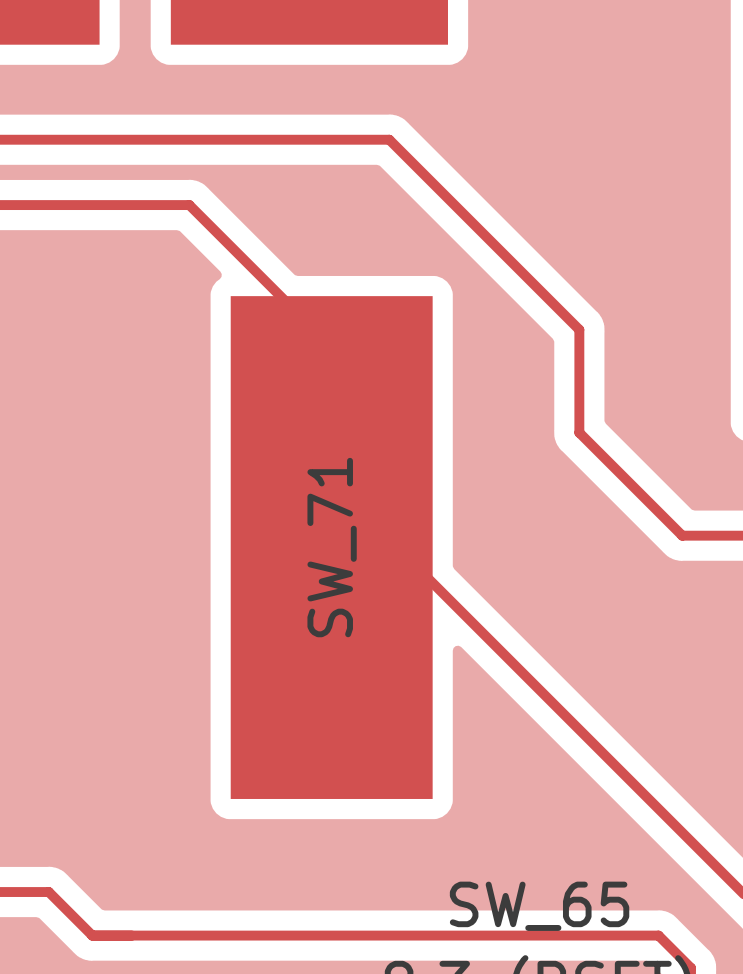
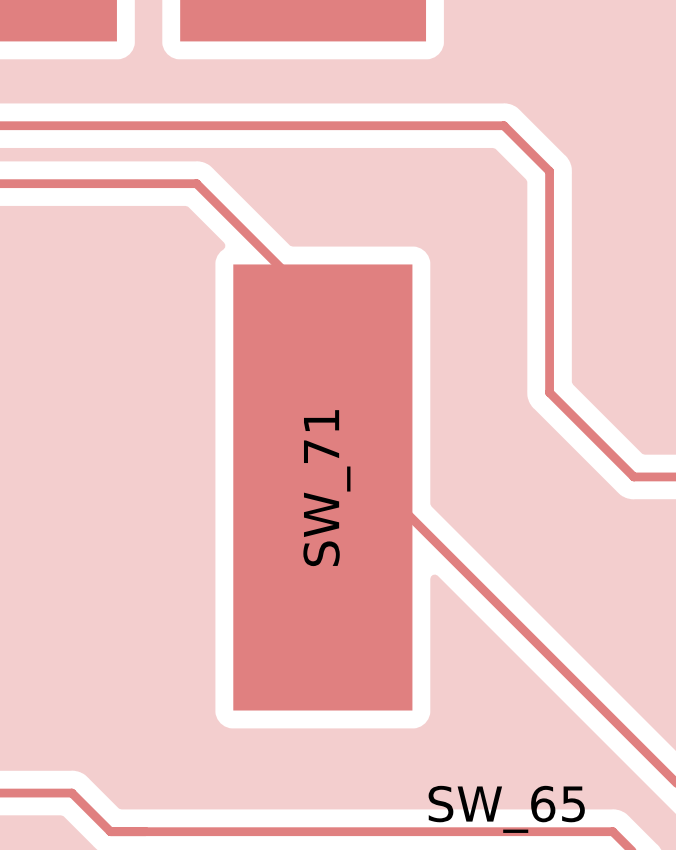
track: (389, 139) (579, 329) (579, 432) (587, 440) -> (373, 125) (503, 125) (549, 171) (549, 392)

